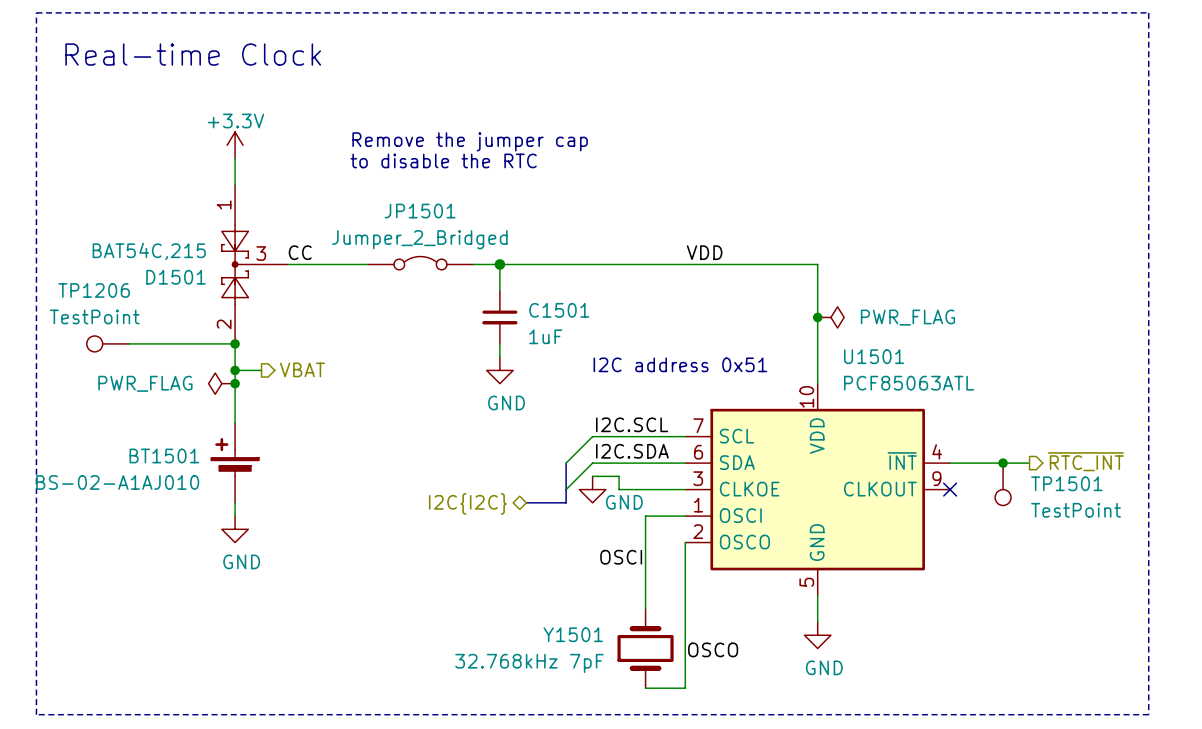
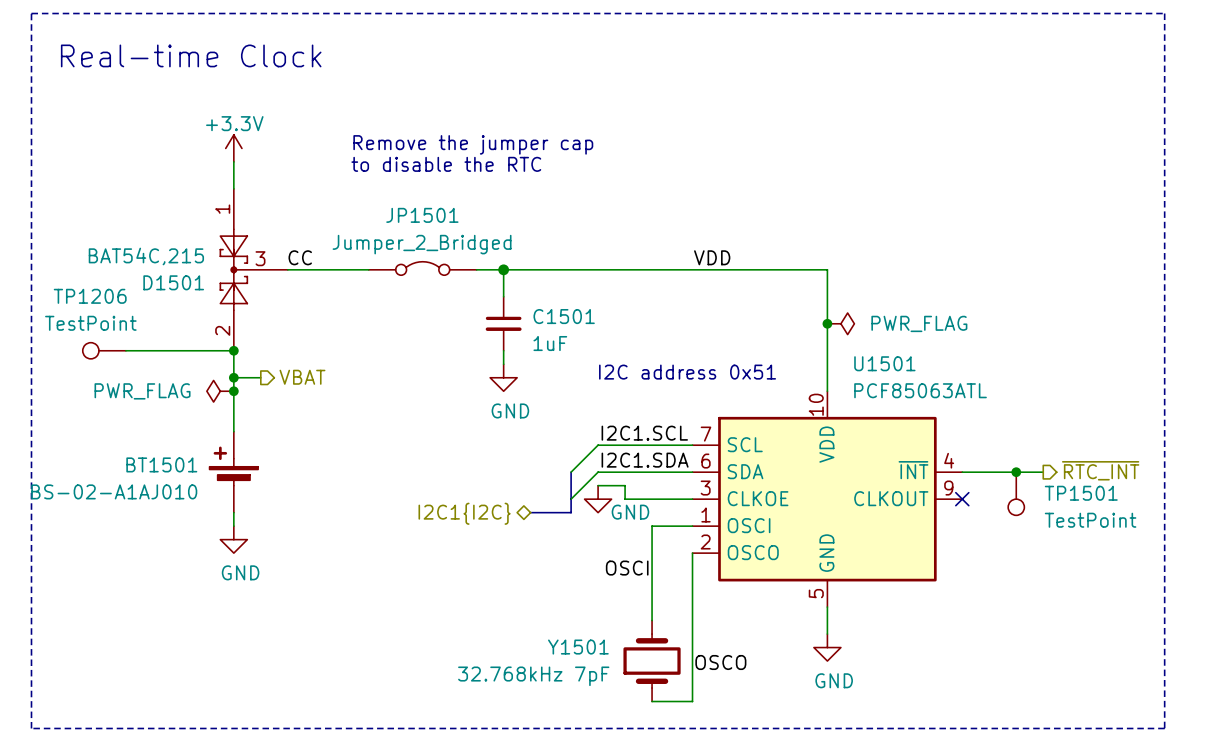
label: I2C.SCL (632, 424) -> I2C1.SCL (644, 433)
label: I2C.SDA (632, 451) -> I2C1.SDA (645, 460)
hierarchical label: I2C{I2C} (467, 503) -> I2C1{I2C} (464, 513)

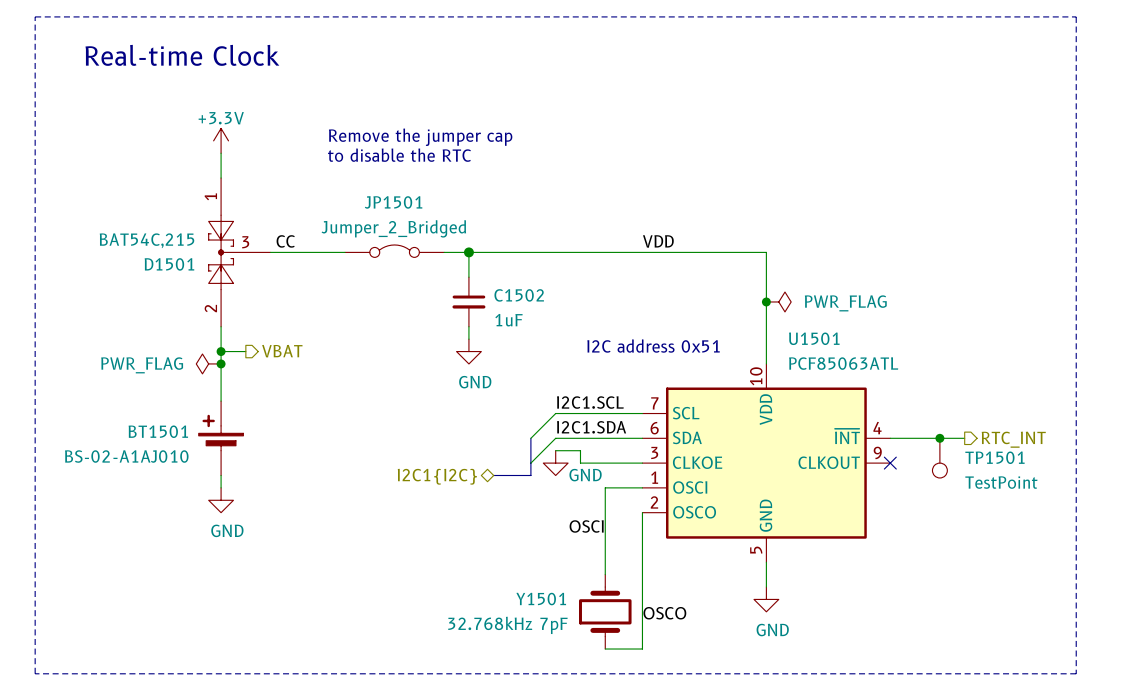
C1501 name: C1501 (564, 316) -> C1502 (519, 295)
TP1206: TestPoint (104, 350) -> none
wire: (125, 350) (233, 350) -> none
junction: (233, 350) -> none
hierarchical label: ~{RTC_INT} (1100, 470) -> RTC_INT (1013, 439)

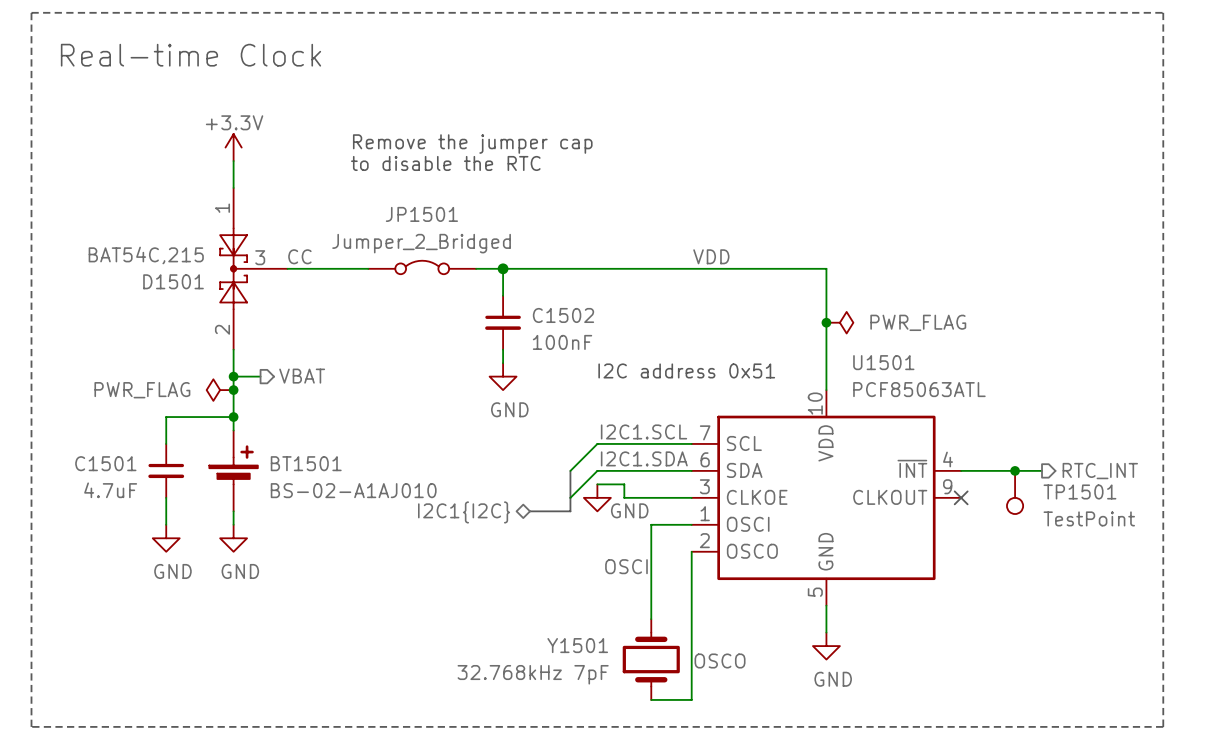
C1502 value: 1uF (508, 320) -> 100nF (562, 342)
wire: none -> (233, 417) (166, 417) (166, 443)
junction: none -> (233, 417)
BT1501 flip: as is (221, 432) -> left-right (233, 464)
C1501: none -> 4.7uF (166, 470)
wire: none -> (166, 497) (166, 524)
power symbol: none -> GND (166, 538)

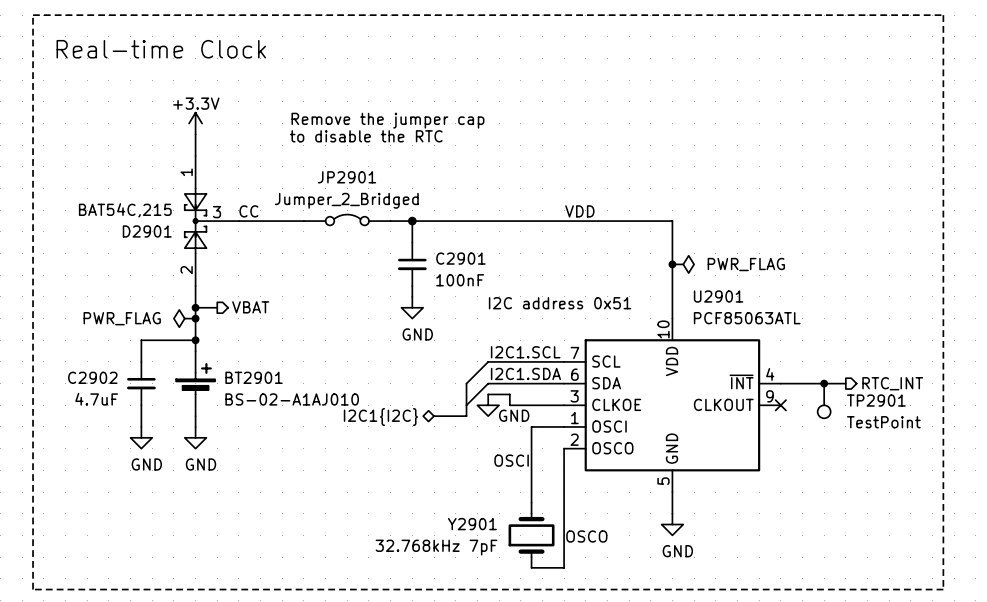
JP1501 name: JP1501 (421, 214) -> JP2901 (347, 177)
D1501 name: D1501 (173, 281) -> D2901 (147, 231)
C1502 name: C1502 (563, 315) -> C2901 (460, 258)
U1501 name: U1501 (883, 362) -> U2901 (718, 296)
C1501 name: C1501 (105, 463) -> C2902 (92, 377)
BT1501 name: BT1501 (306, 463) -> BT2901 (253, 377)
TP1501 name: TP1501 (1079, 491) -> TP2901 (876, 400)
Y1501 name: Y1501 (577, 645) -> Y2901 (472, 524)

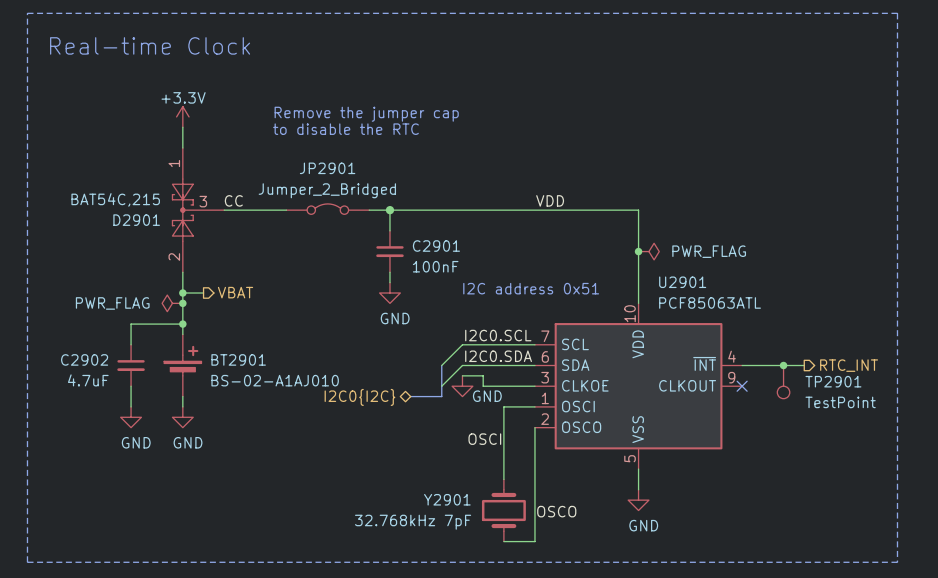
label: I2C1.SCL (525, 352) -> I2C0.SCL (498, 335)
label: I2C1.SDA (525, 373) -> I2C0.SDA (498, 356)
hierarchical label: I2C1{I2C} (380, 417) -> I2C0{I2C} (359, 397)
U2901 pin name: GND (672, 448) -> VSS (638, 429)

